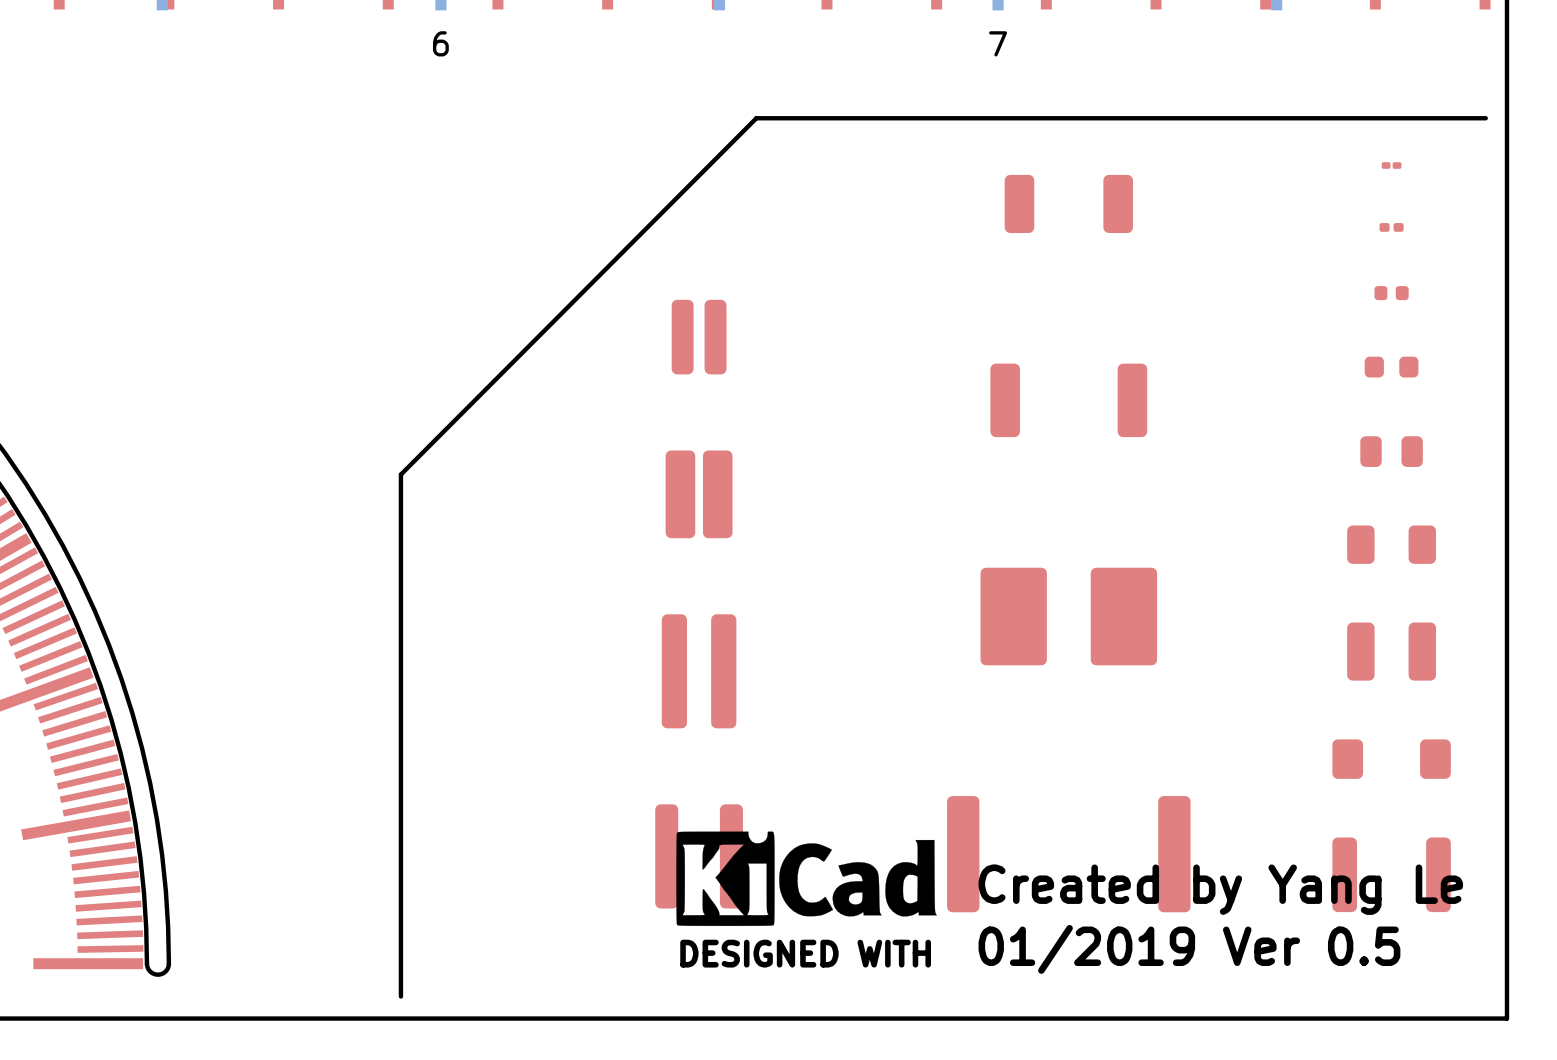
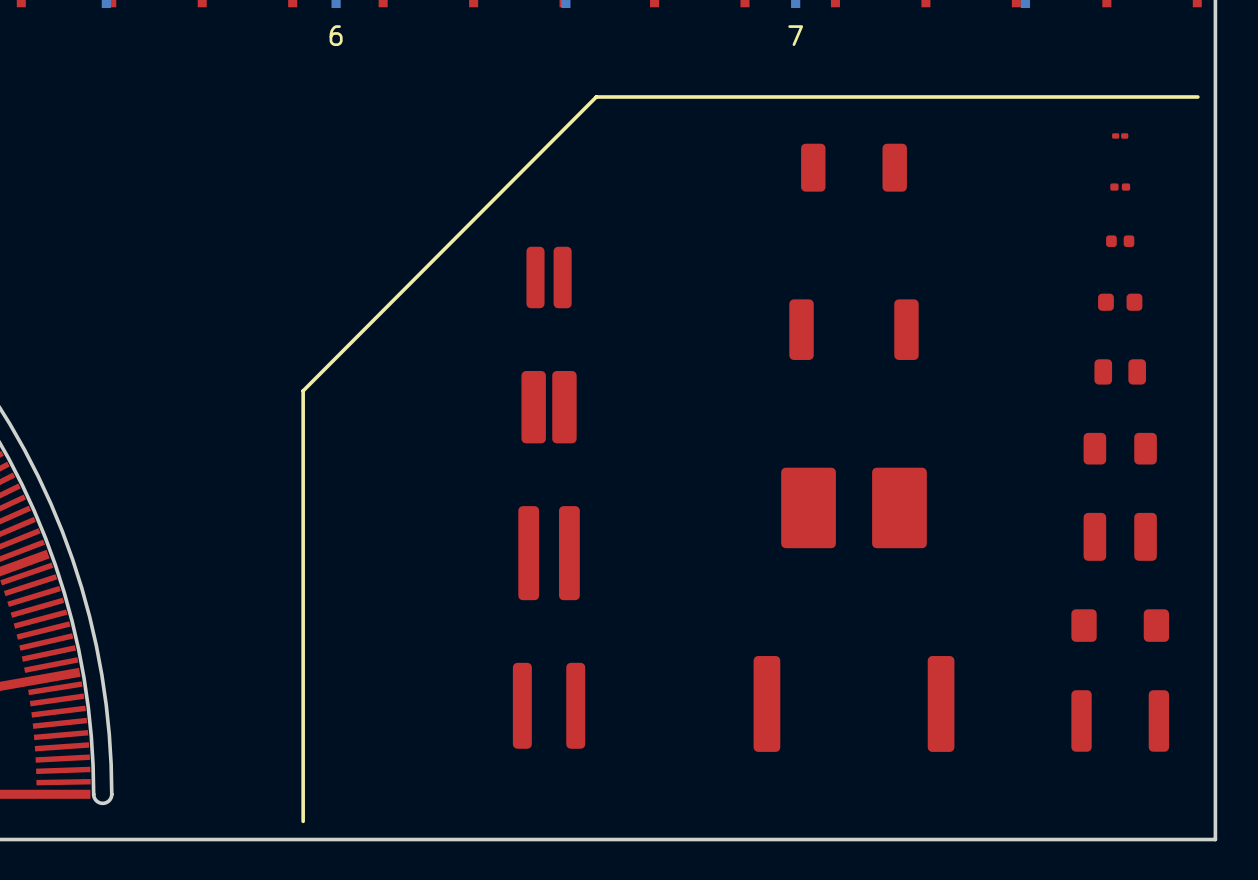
drawing: [676, 831, 937, 926] -> none
text: Created by Yang Le (1220, 889) -> none
text: 01/2019 Ver 0.5 (1189, 949) -> none
text: DESIGNED WITH (805, 953) -> none

